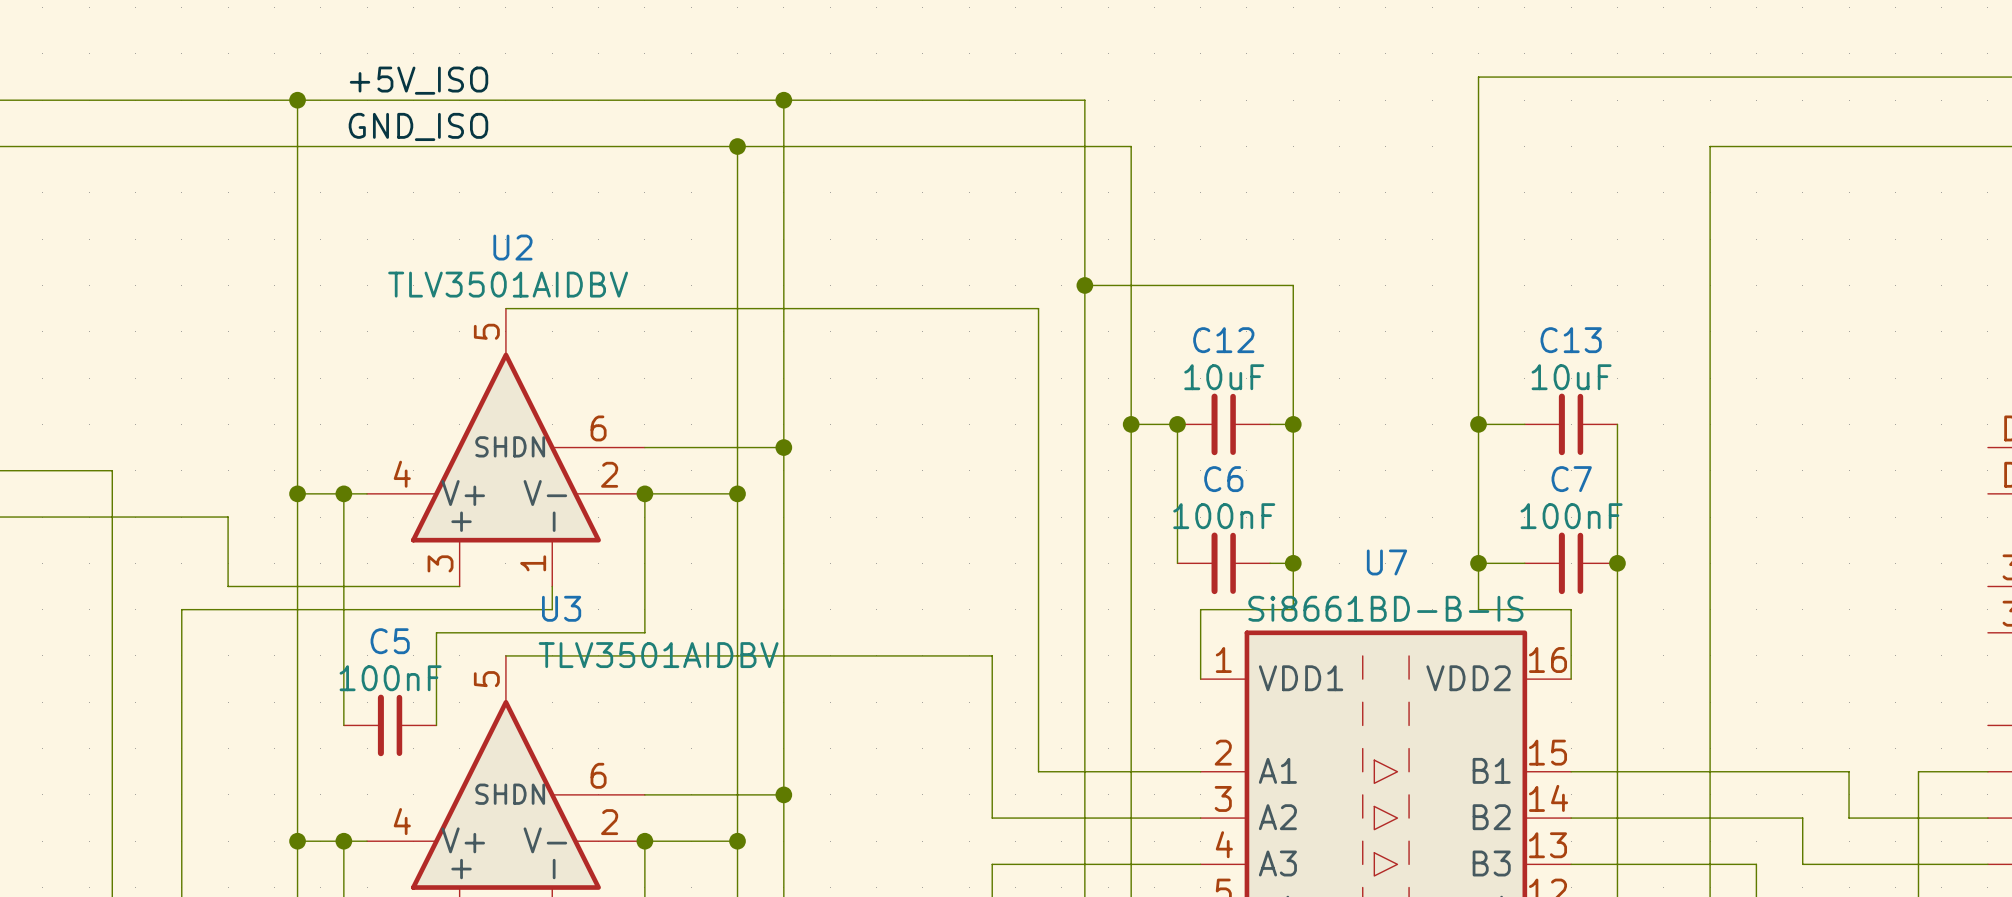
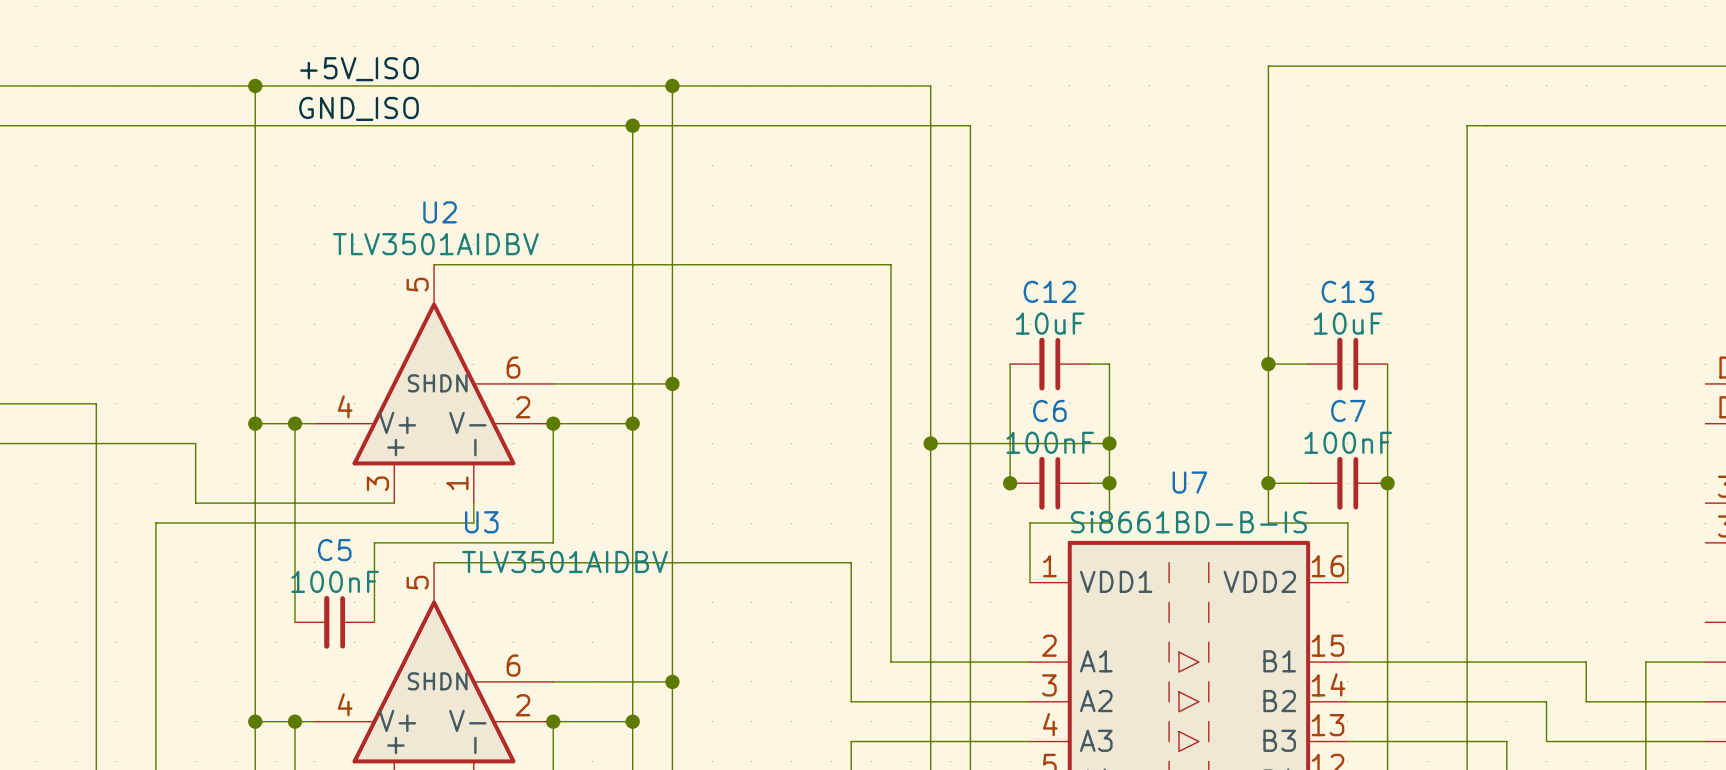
wire: (1084, 285) (1293, 285) (1293, 424) -> none
junction: (1084, 285) -> none
wire: (1131, 424) (1177, 424) -> none
junction: (1131, 424) -> none
junction: (1177, 424) -> none
junction: (1293, 424) -> none
wire: none -> (930, 443) (1109, 443)
junction: none -> (930, 443)
junction: none -> (1109, 443)
junction: none -> (1010, 483)

